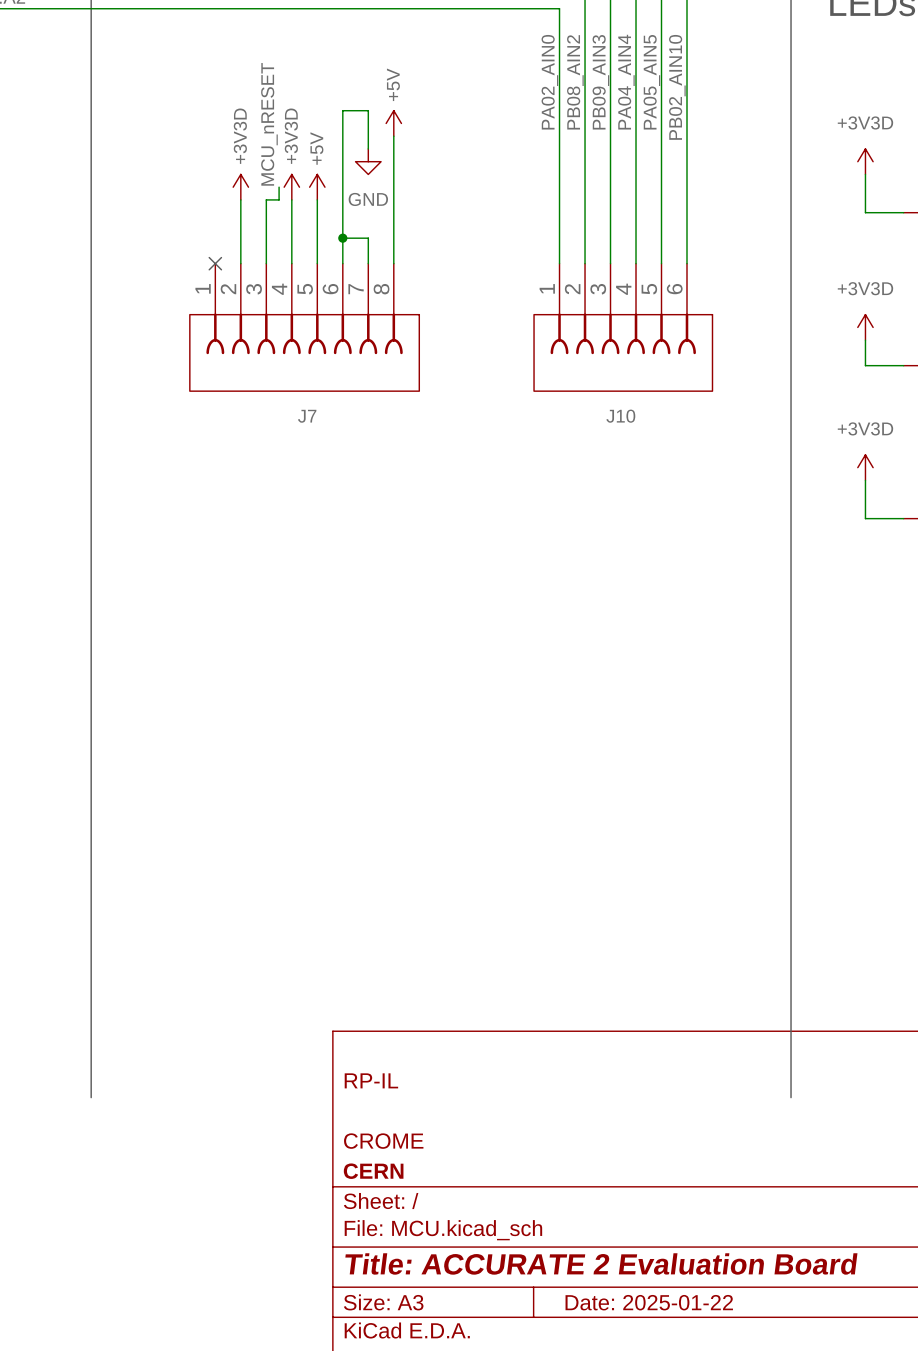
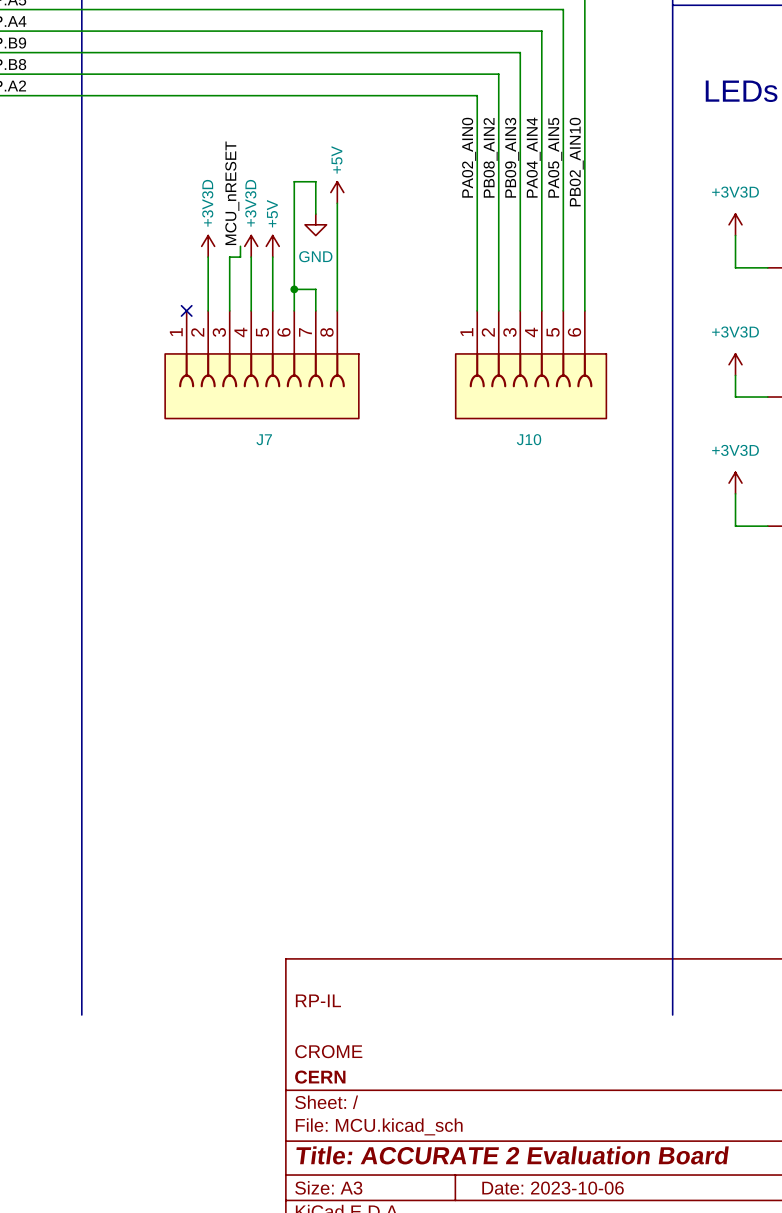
title block: Date: 2025-01-22 (649, 1302) -> Date: 2023-10-06 (553, 1188)

